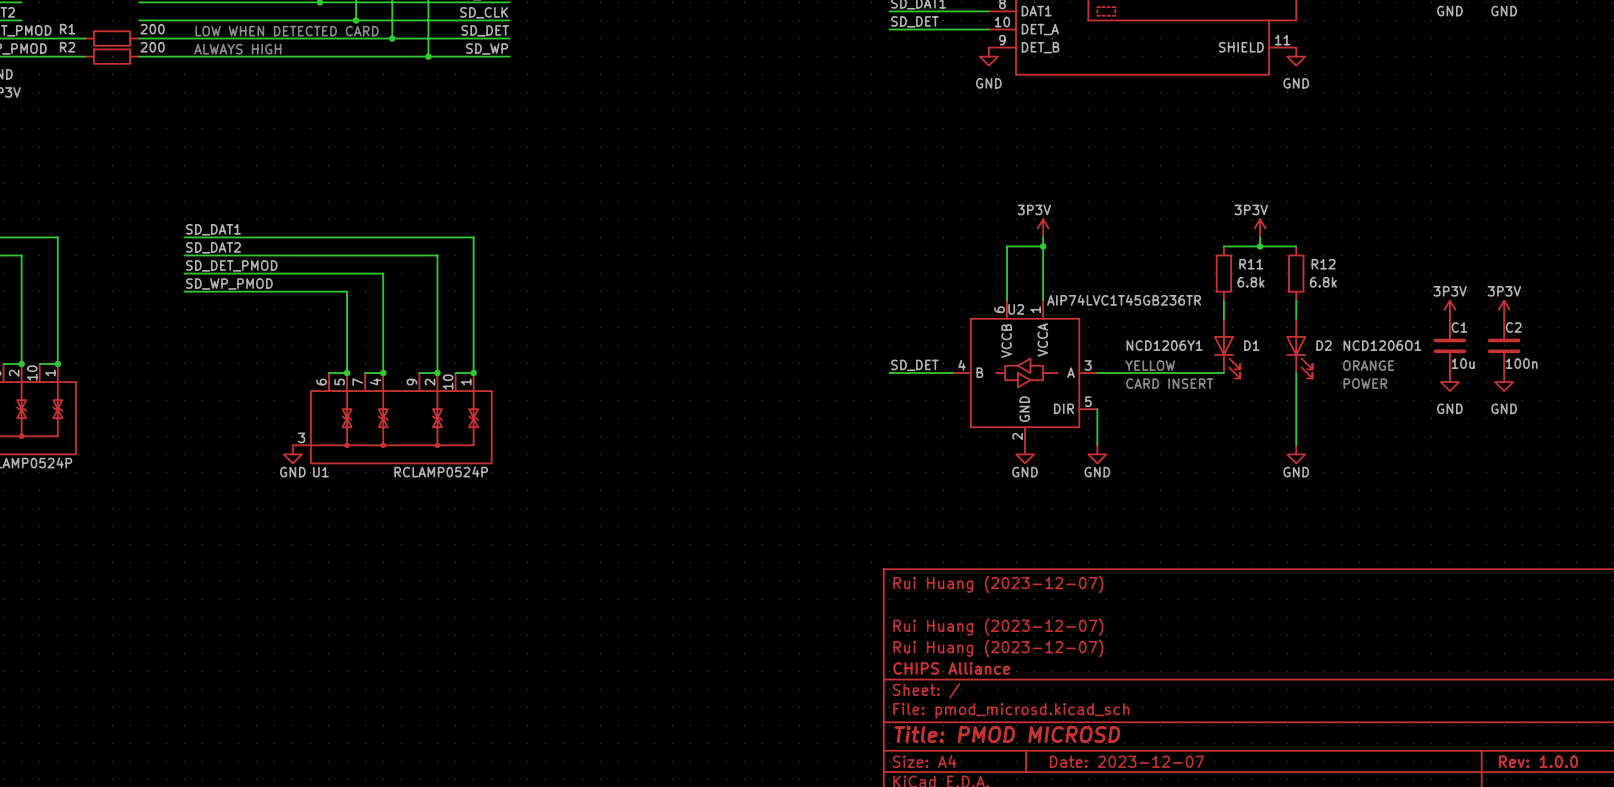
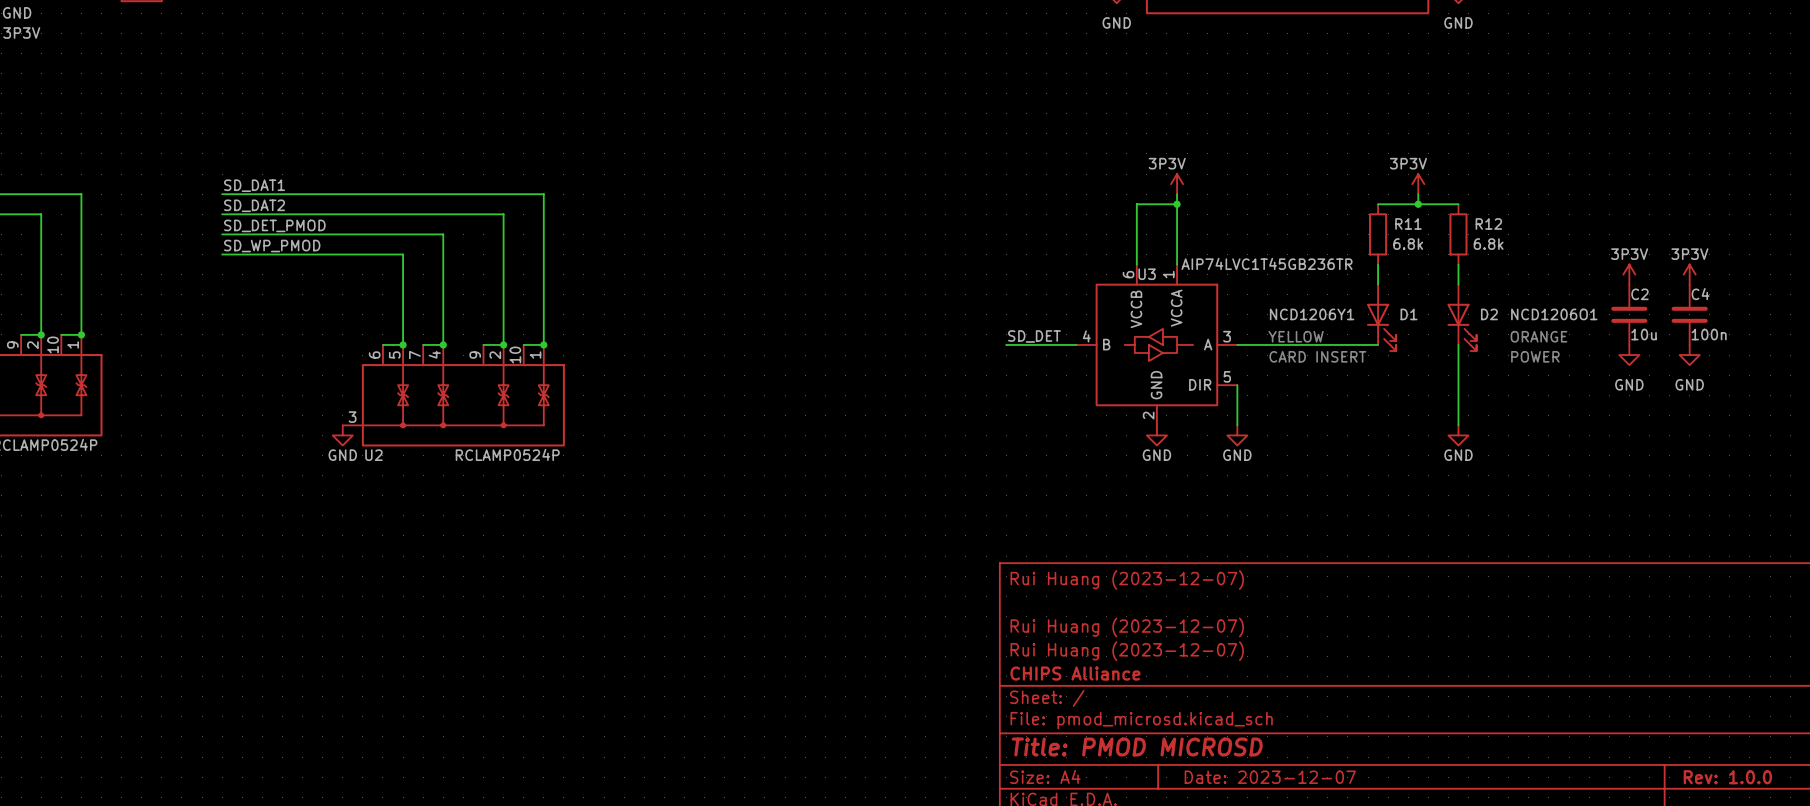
U2 name: U2 (1016, 309) -> U3 (1147, 274)
C1 name: C1 (1459, 327) -> C2 (1639, 294)
C2 name: C2 (1513, 327) -> C4 (1700, 294)
U1 name: U1 (320, 472) -> U2 (373, 455)

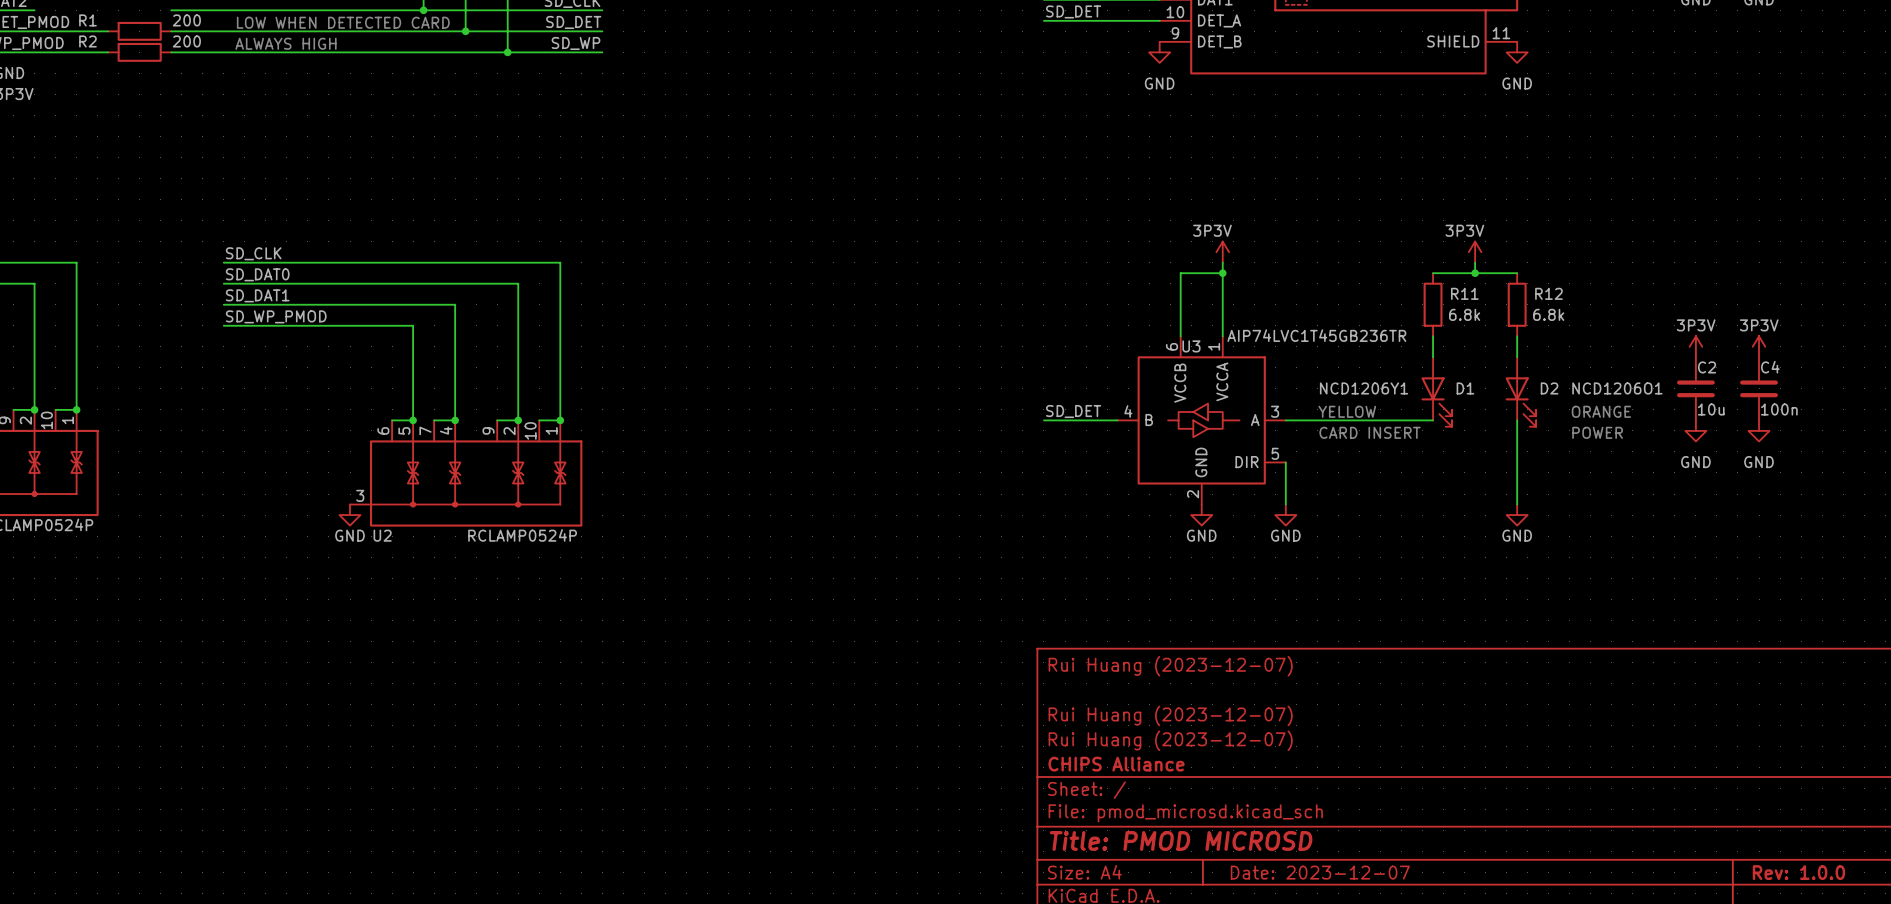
label: SD_DAT1 (254, 185) -> SD_CLK (253, 253)
label: SD_DAT2 (254, 205) -> SD_DAT0 (257, 274)
label: SD_DET_PMOD (274, 225) -> SD_DAT1 (257, 295)

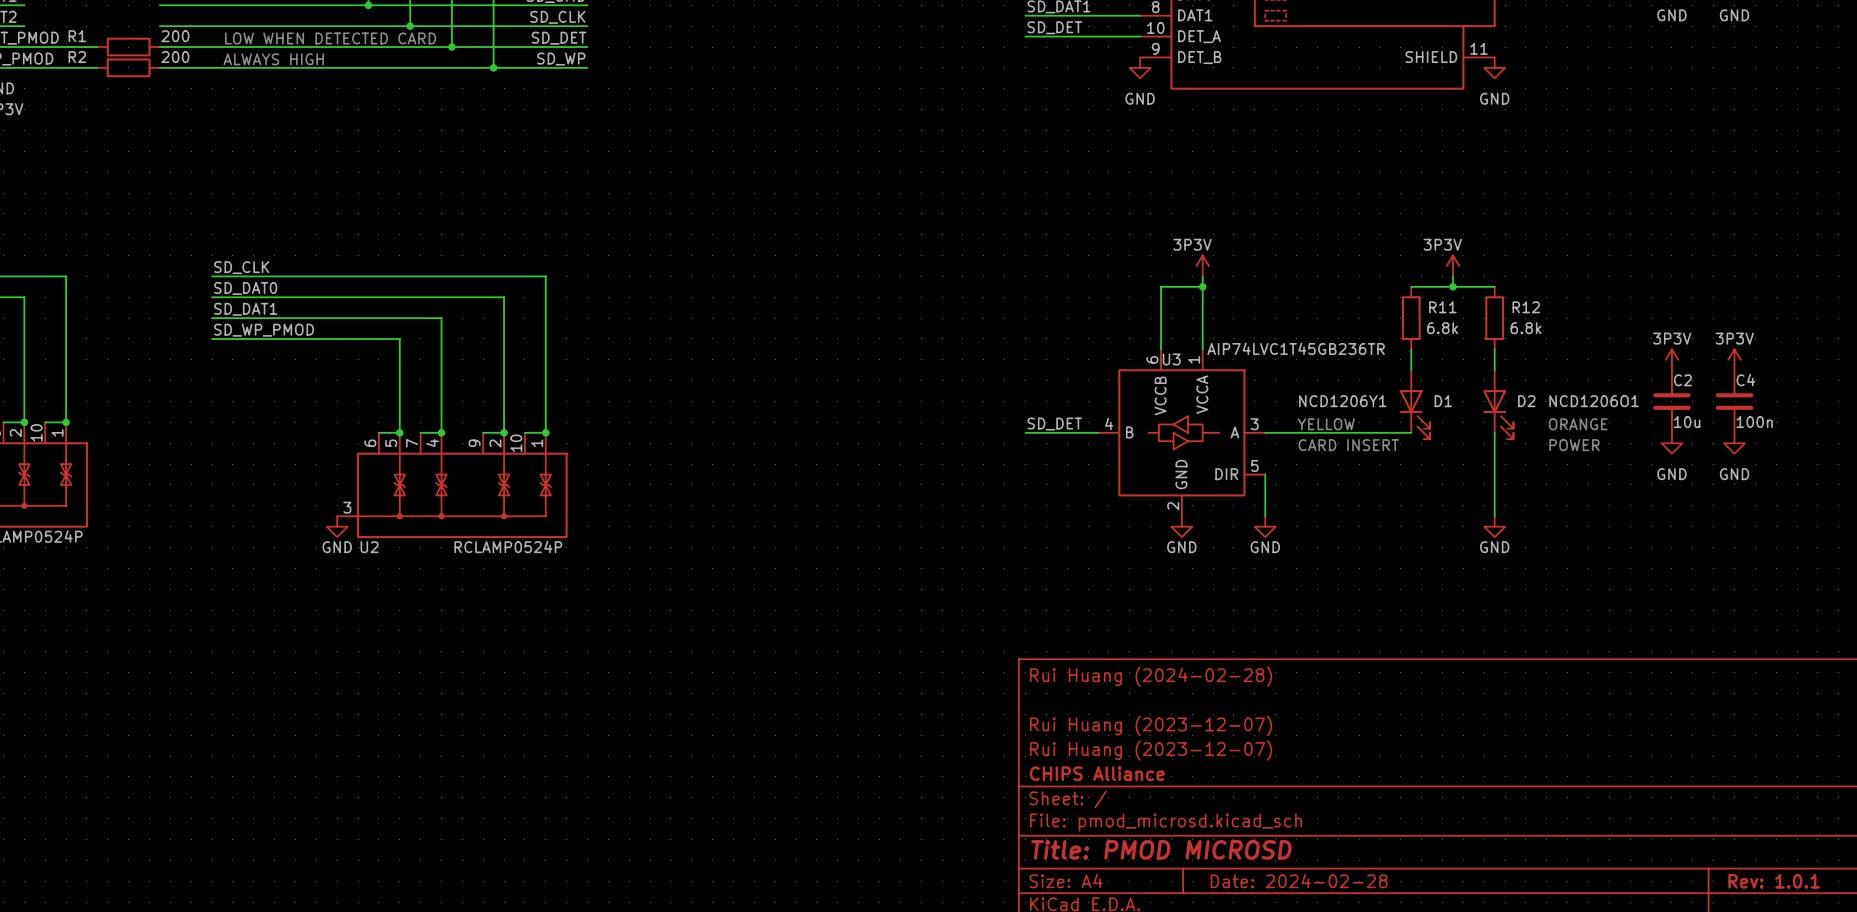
title block: Rui Huang (2023-12-07) (1170, 666) -> Rui Huang (2024-02-28) (1151, 676)
title block: Date: 2023-12-07 (1320, 872) -> Date: 2024-02-28 (1299, 880)
title block: Rev: 1.0.0 (1798, 872) -> Rev: 1.0.1 (1774, 881)

